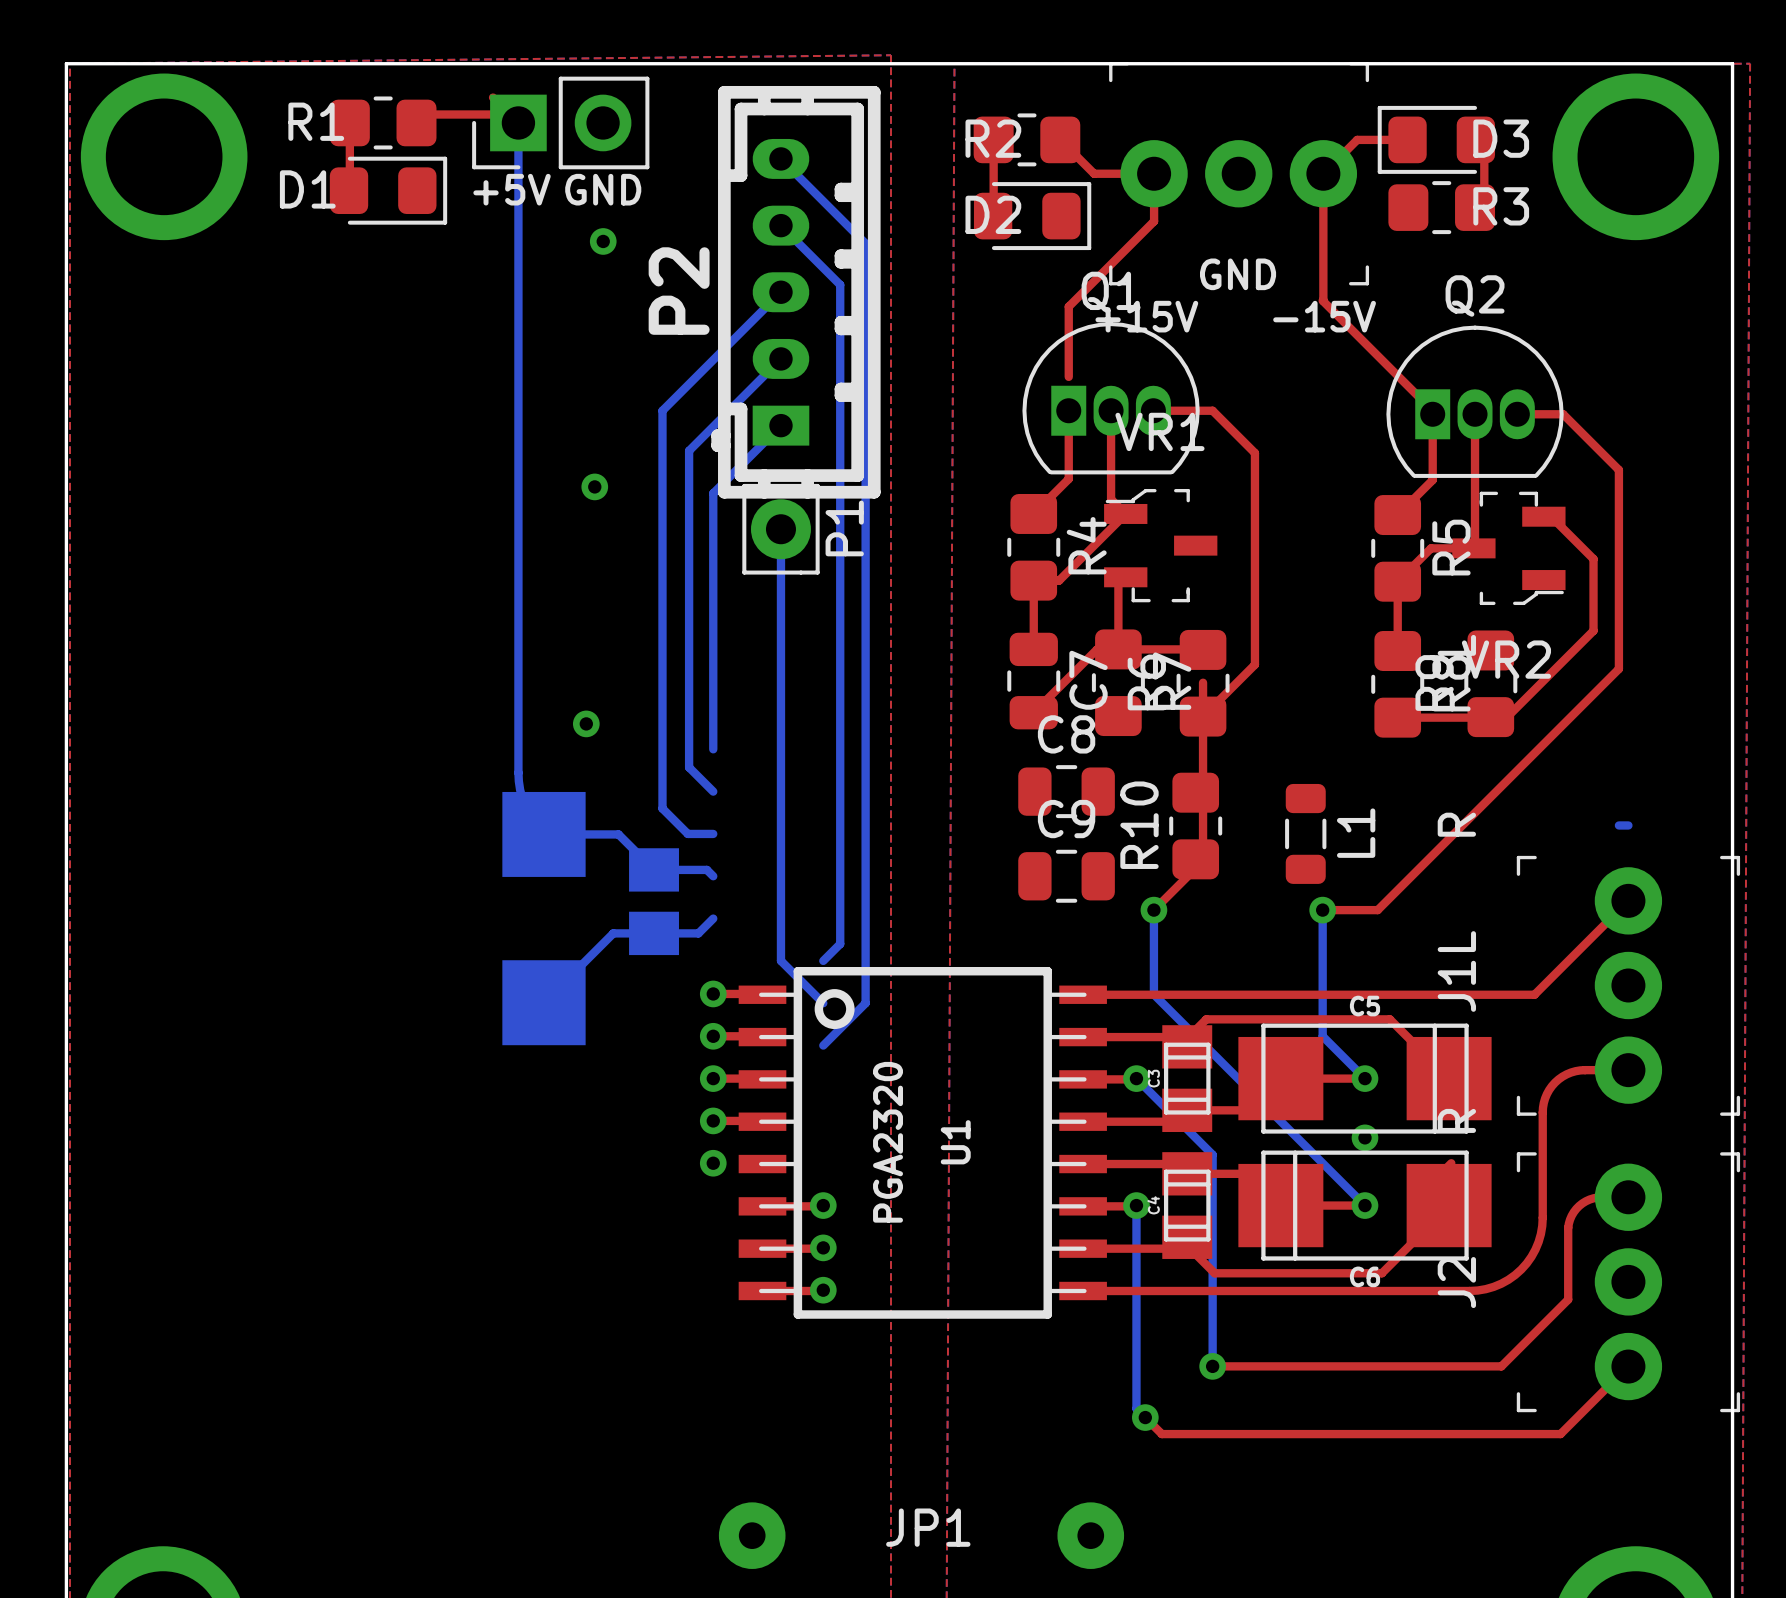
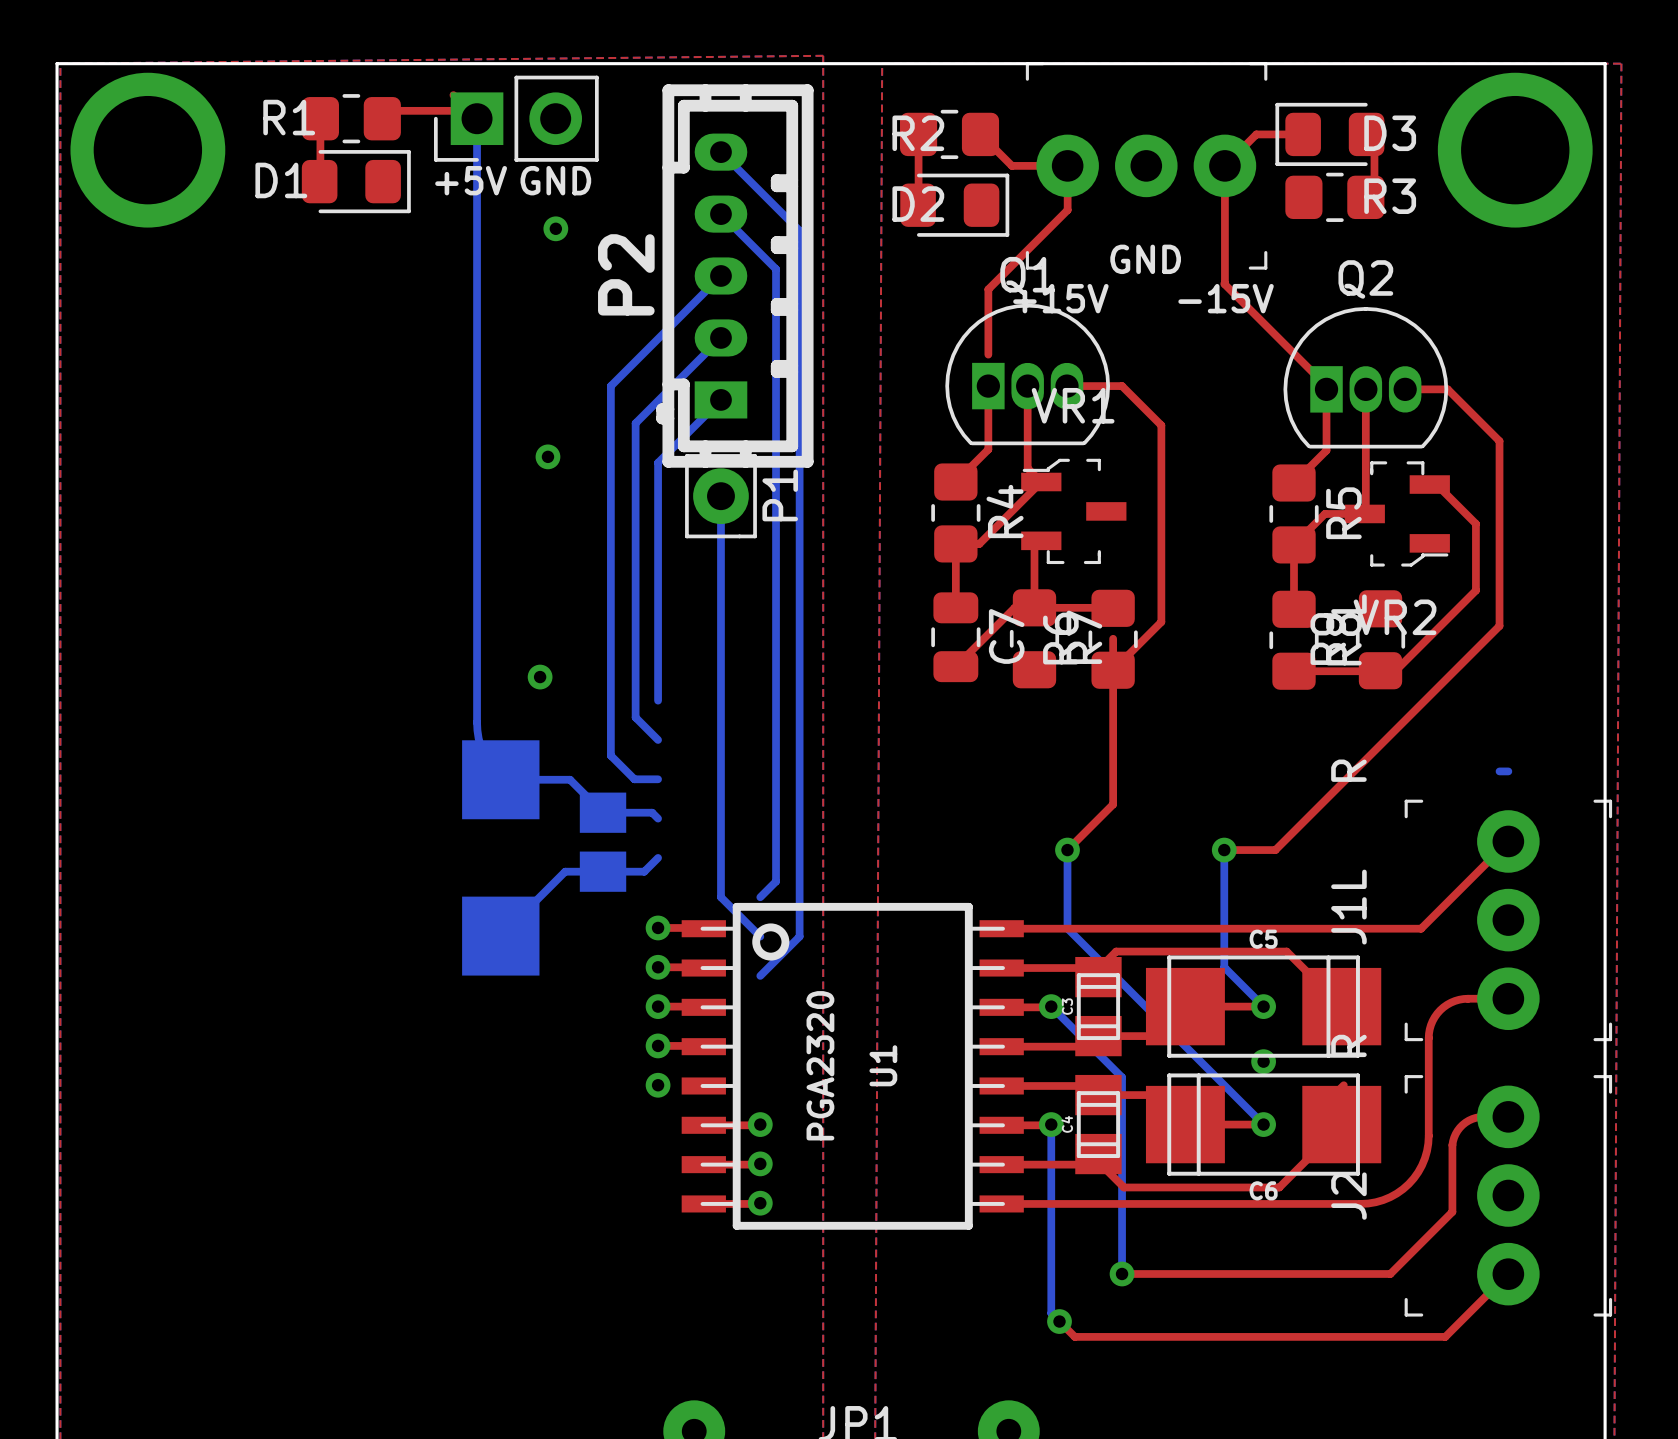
C8: (1066, 791) -> none
R10: (1195, 826) -> none
L1: (1305, 833) -> none
C9: (1066, 876) -> none

